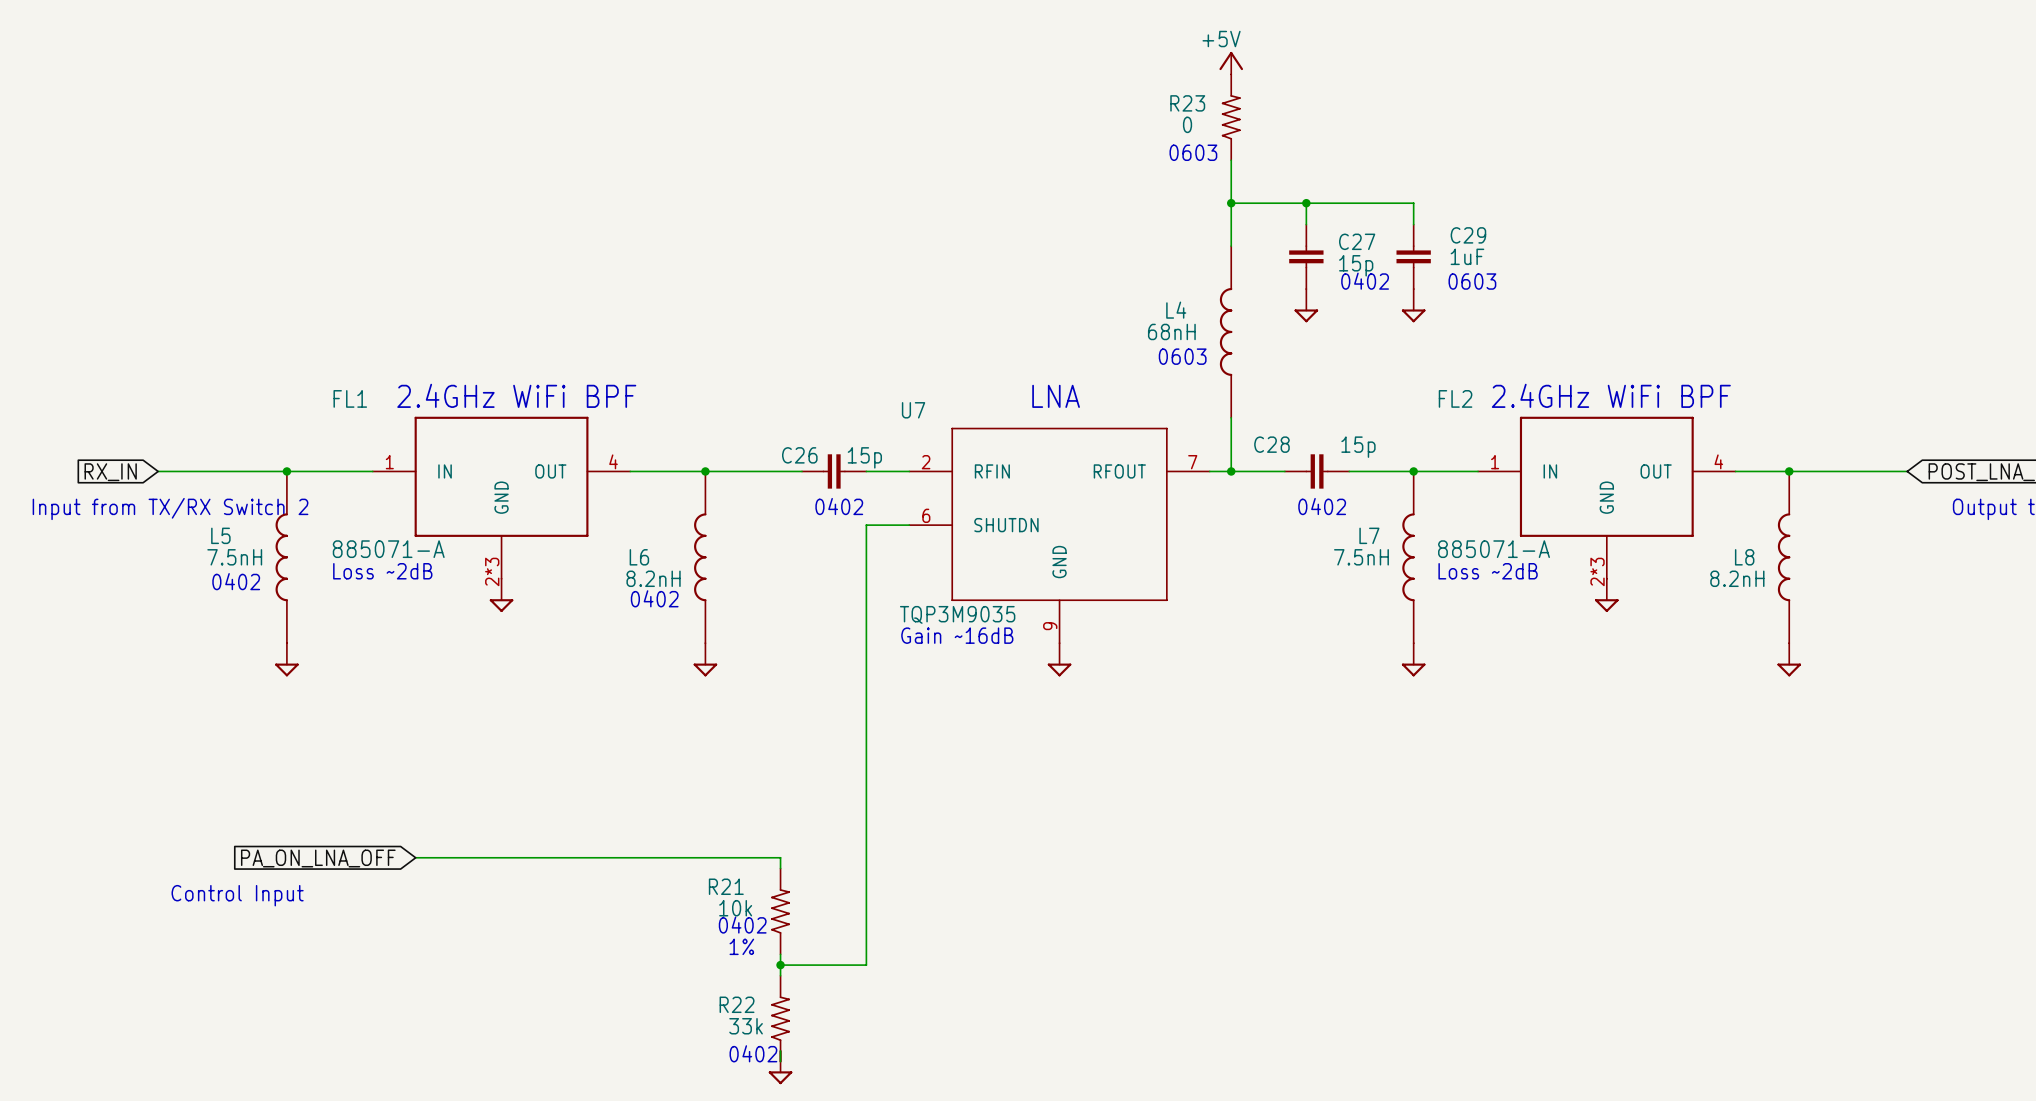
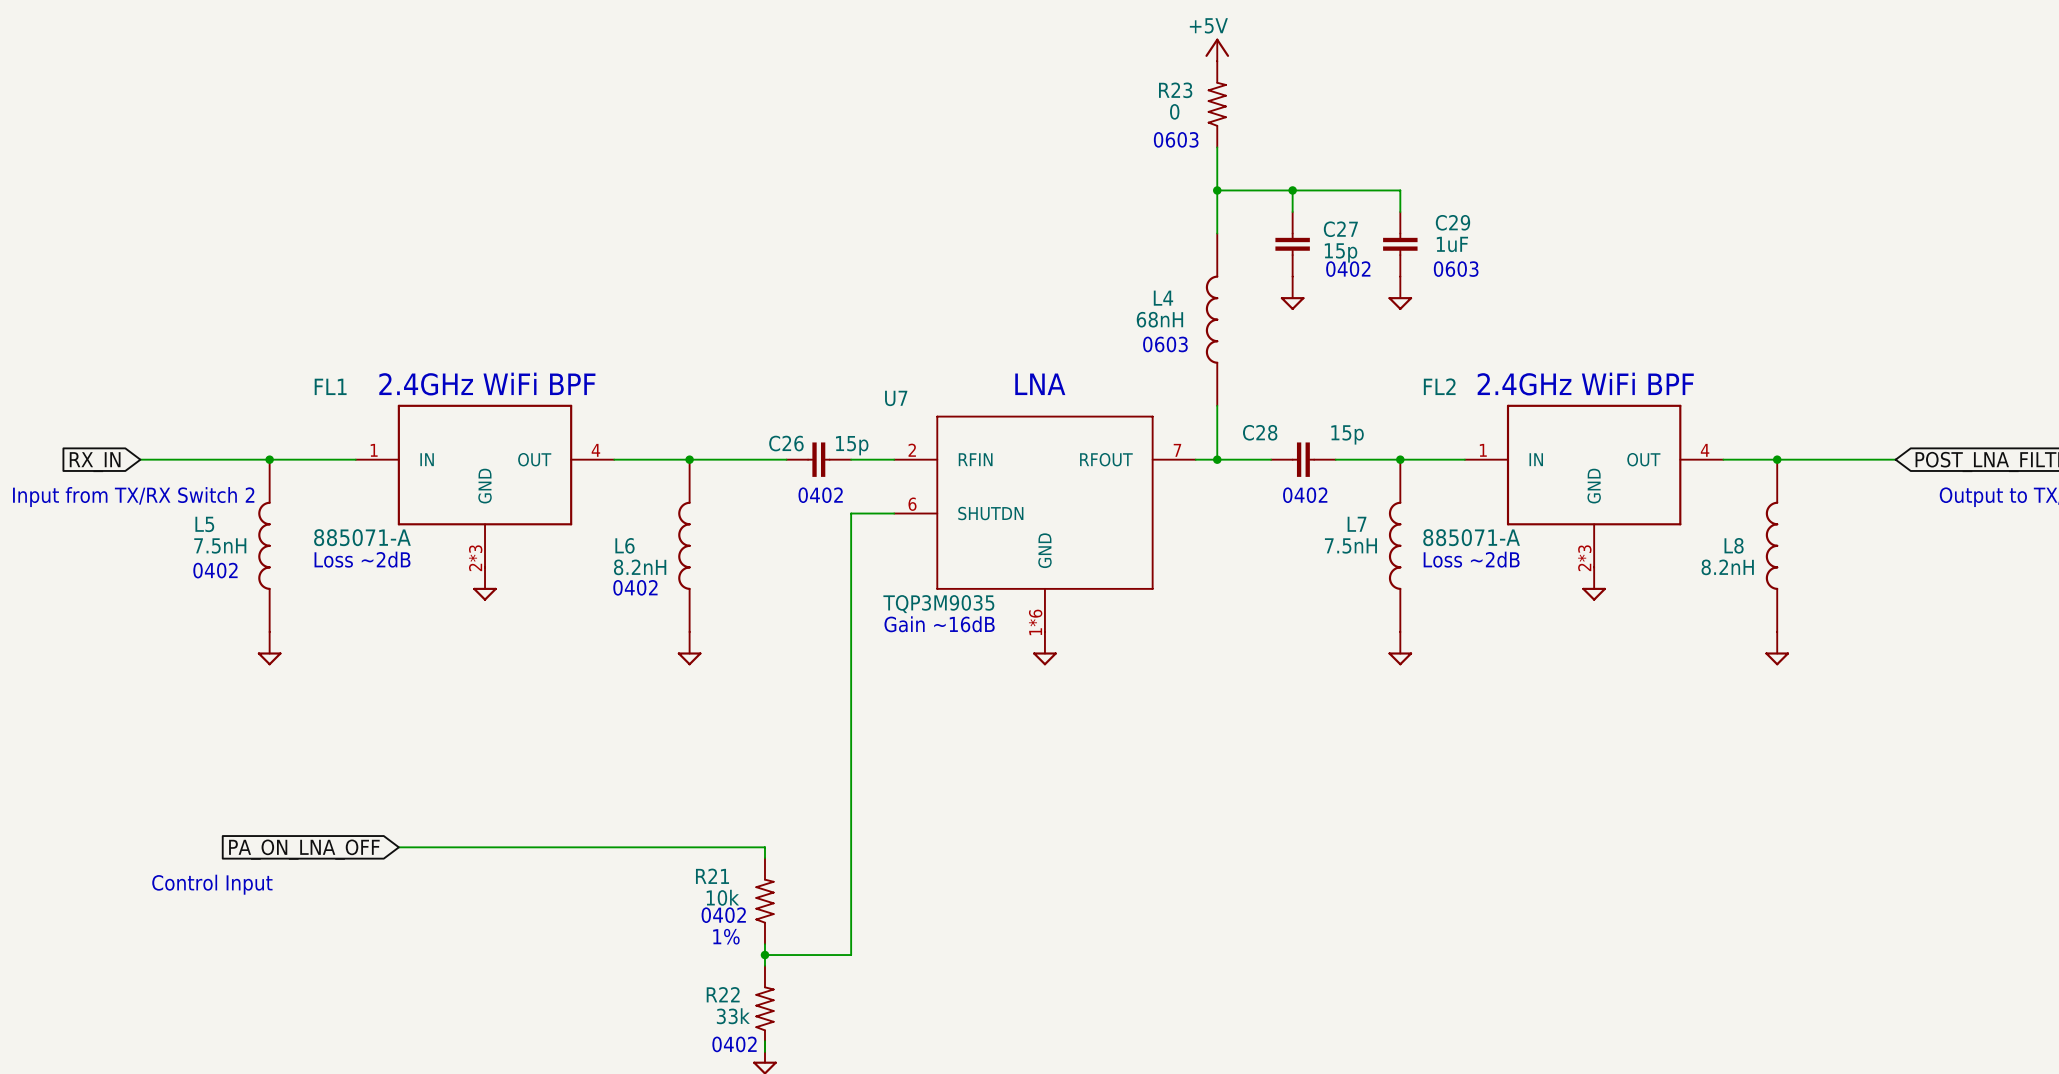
U7 pin number: 9 (1050, 626) -> 1*6 (1035, 622)

